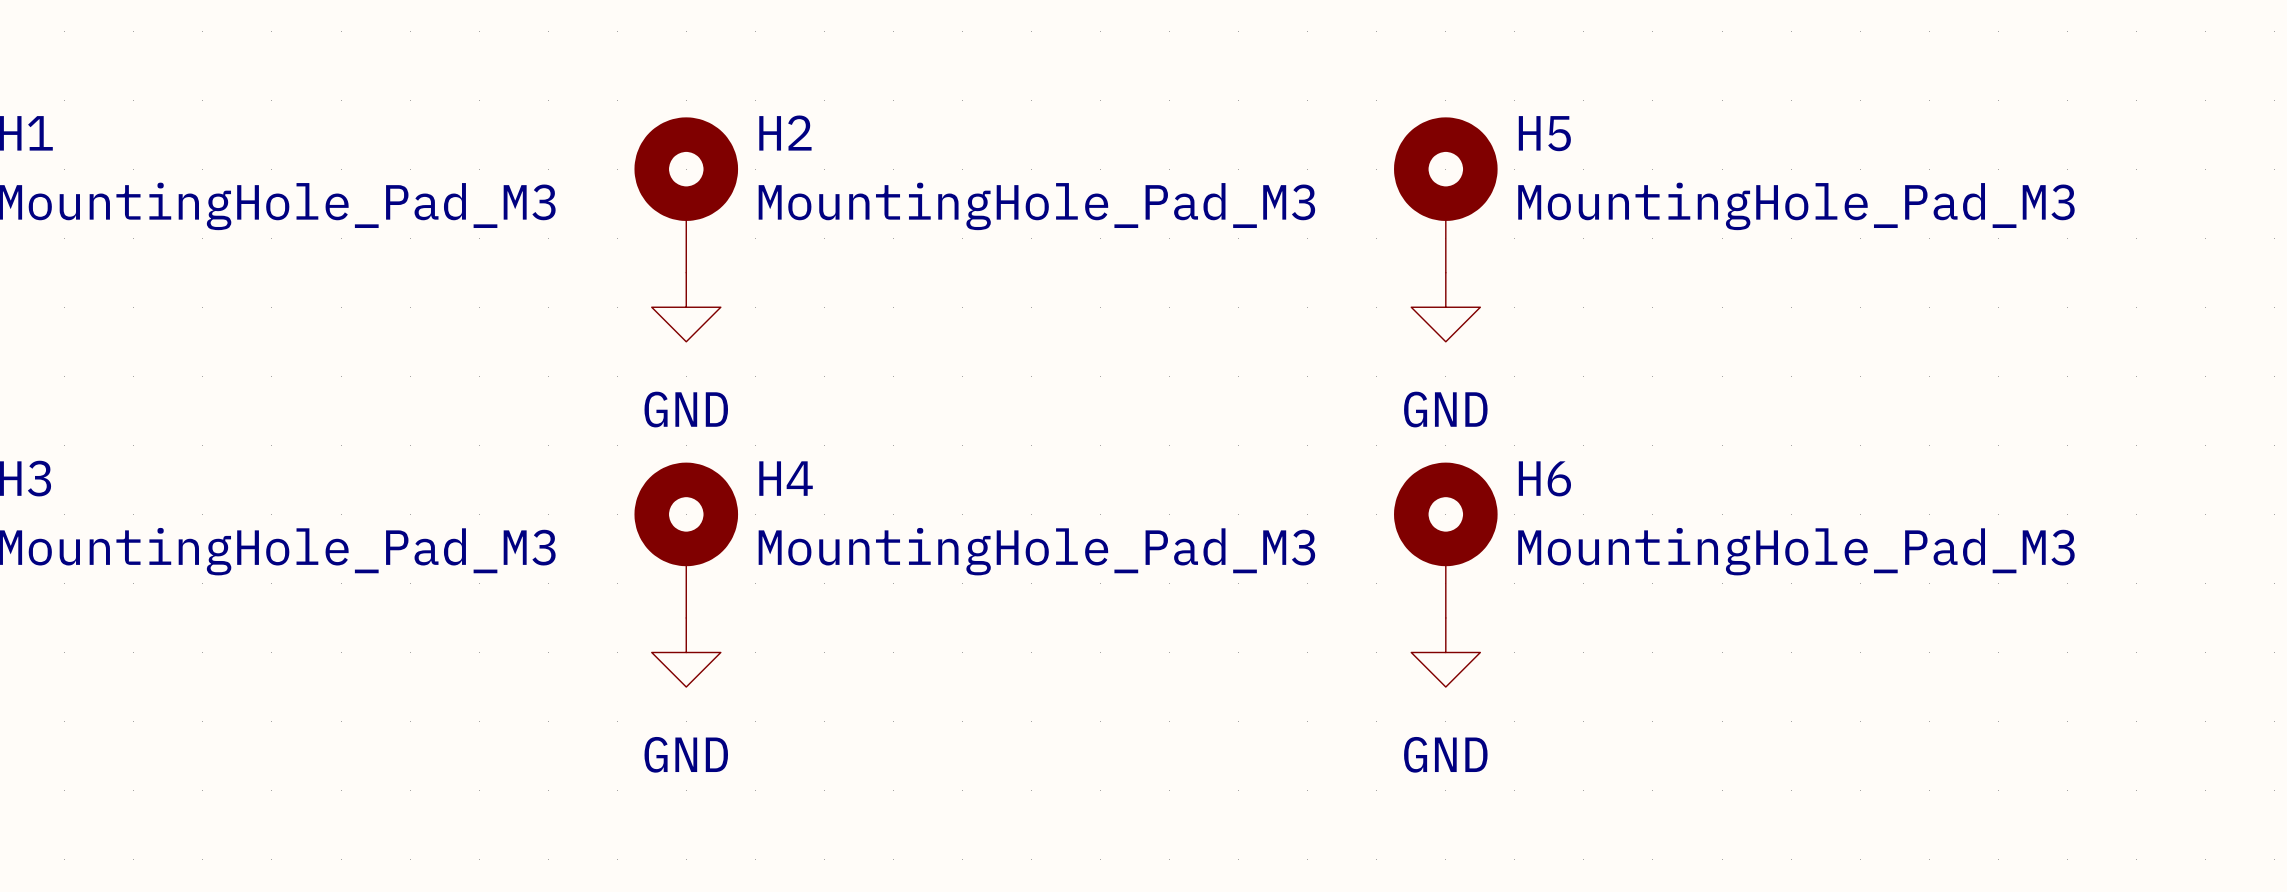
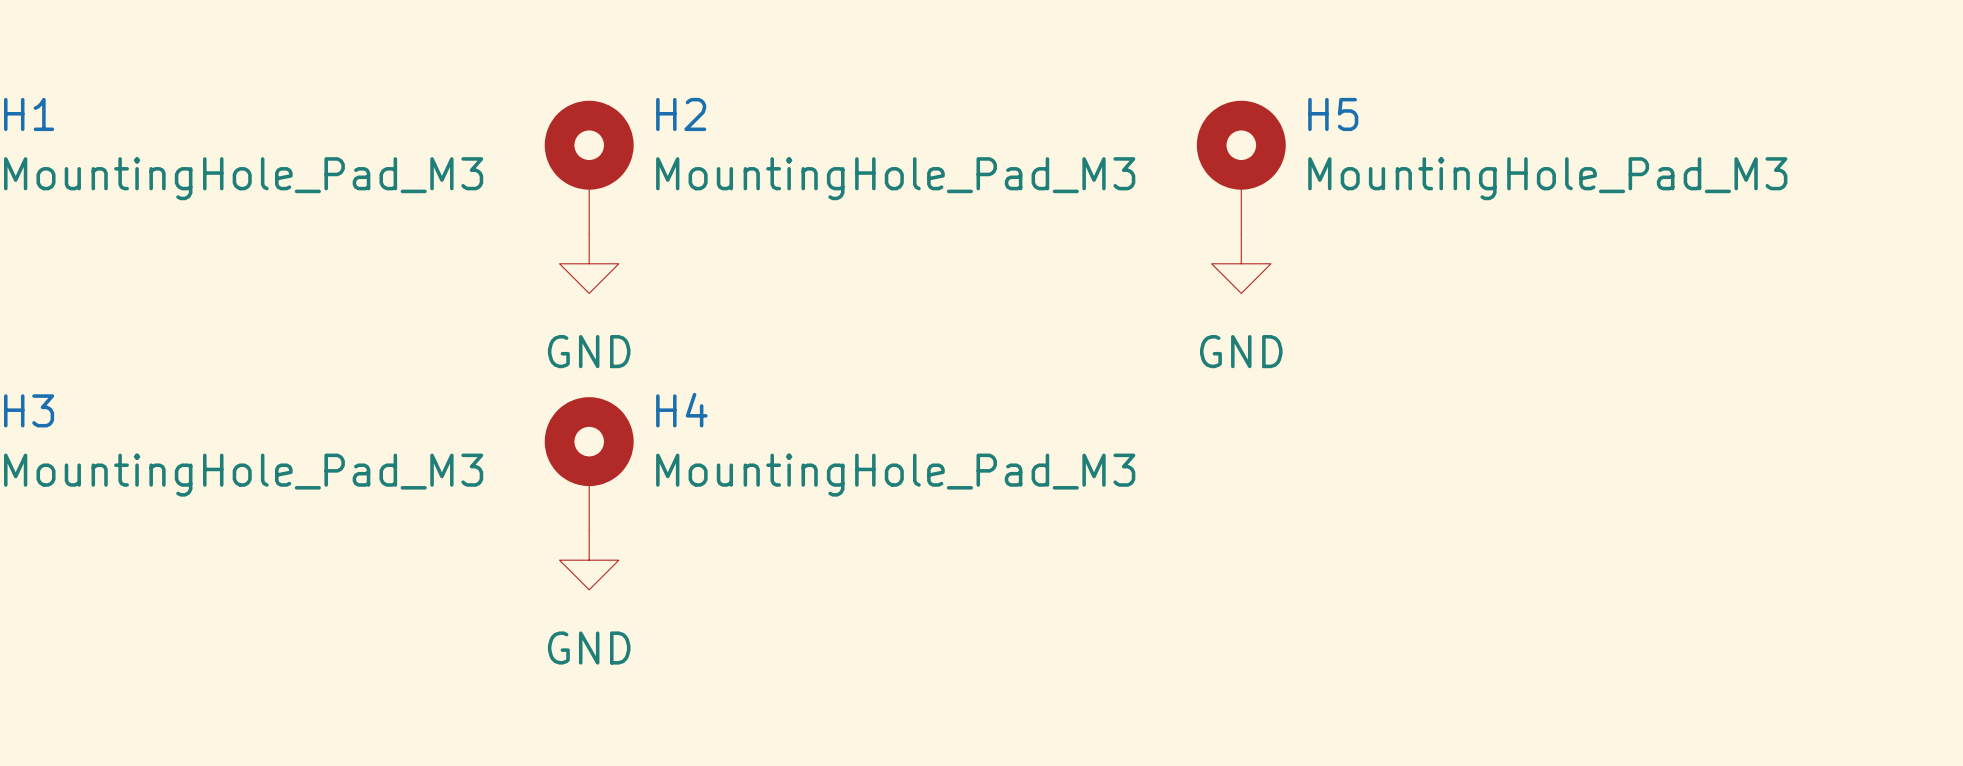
H6: MountingHole_Pad_M3 (1445, 540) -> none
power symbol: GND (1445, 652) -> none

